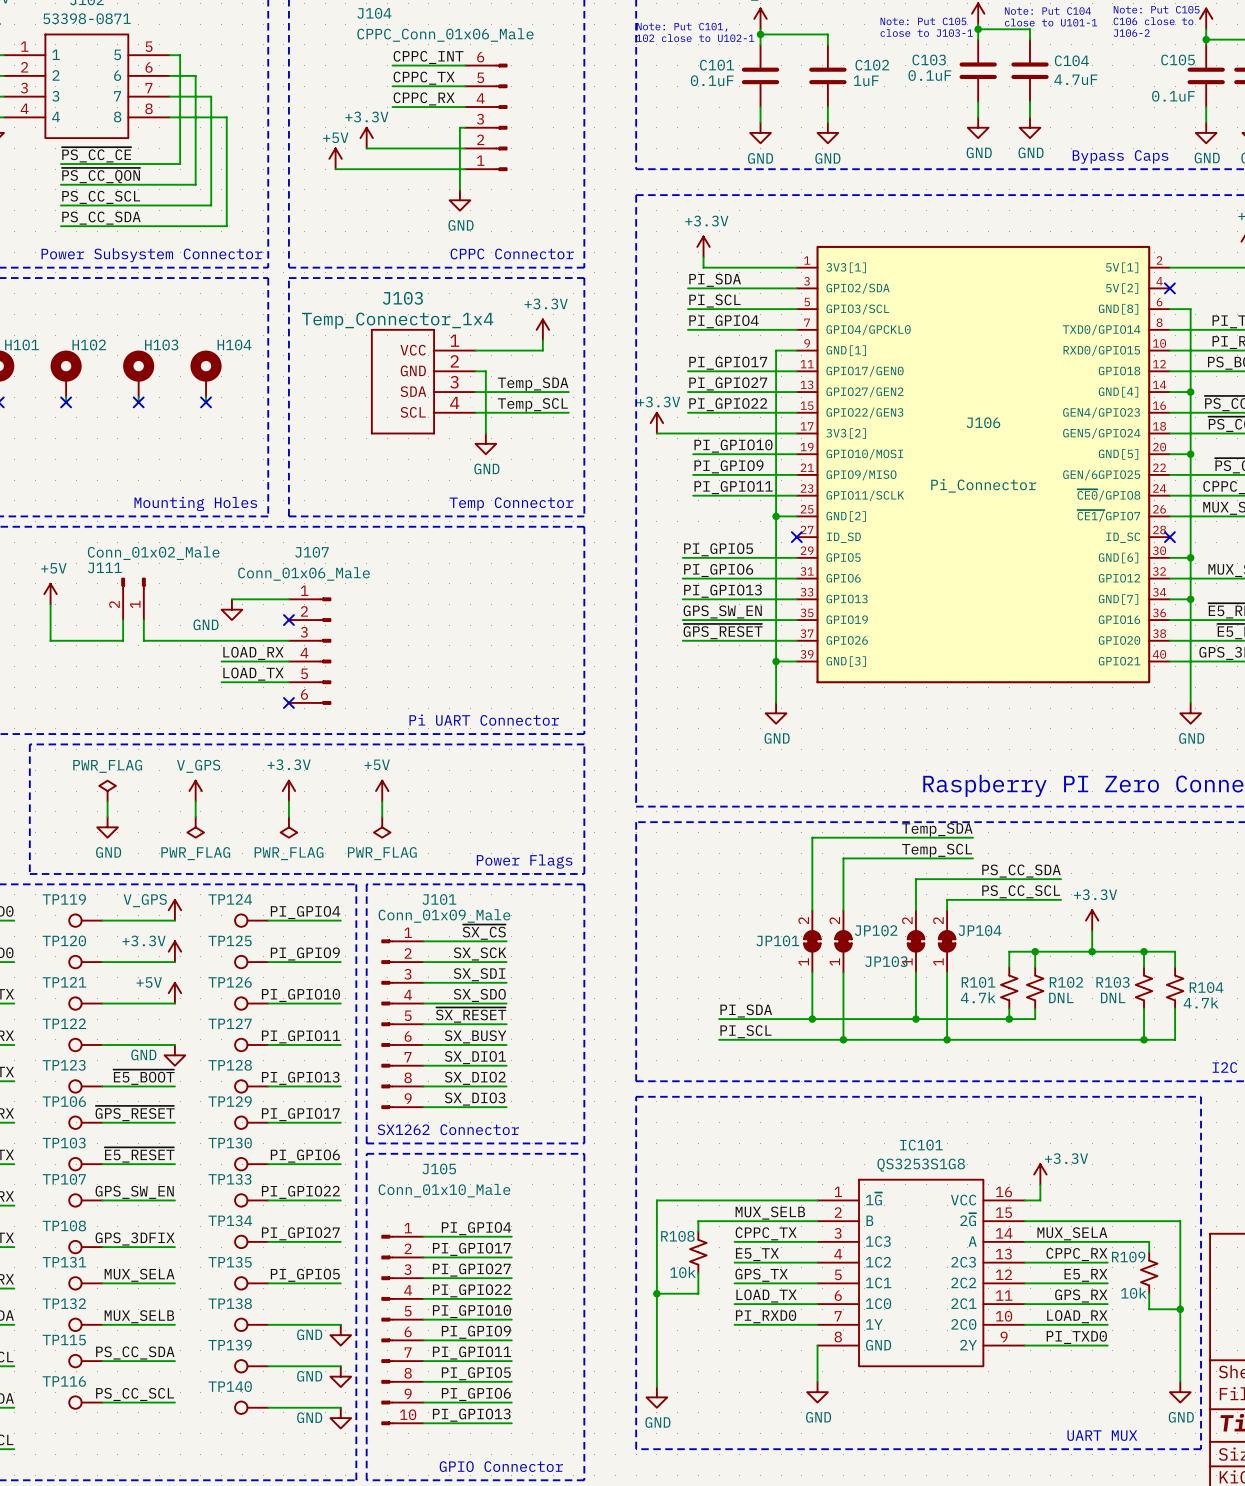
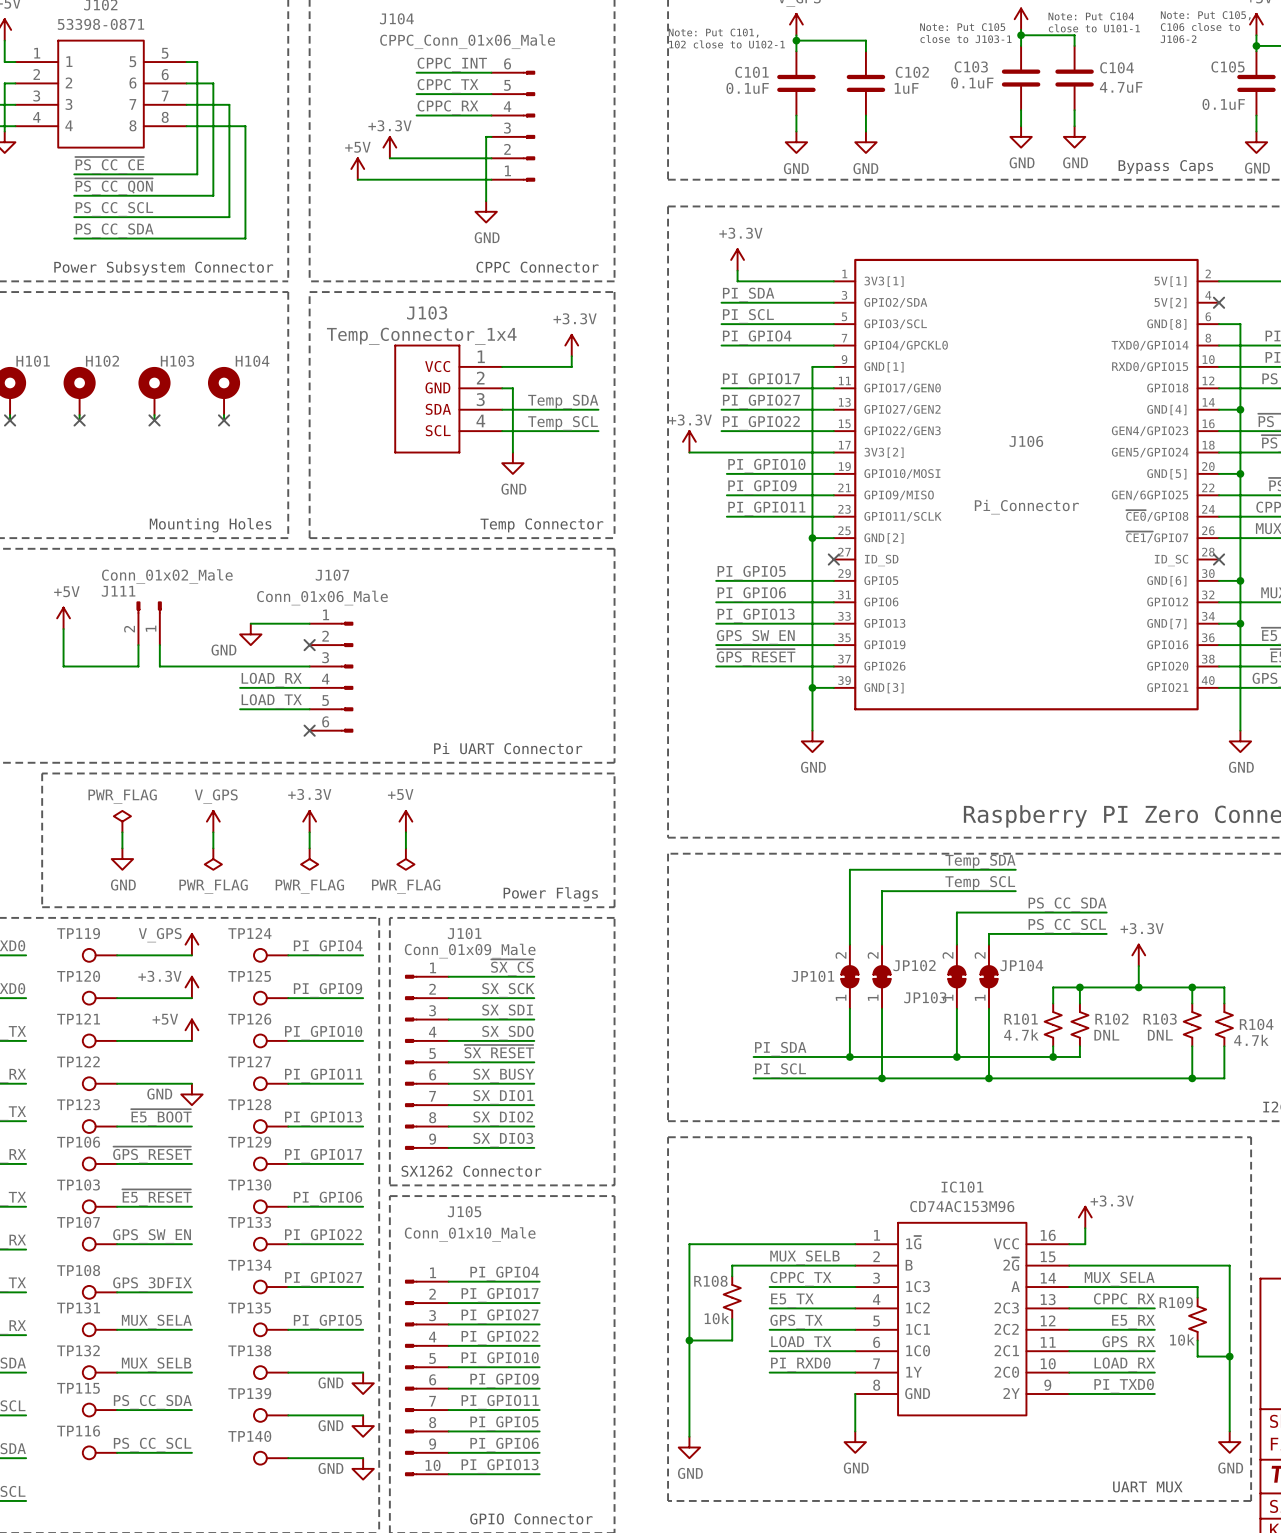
IC101 value: QS3253S1G8 (921, 1165) -> CD74AC153M96 (962, 1206)

